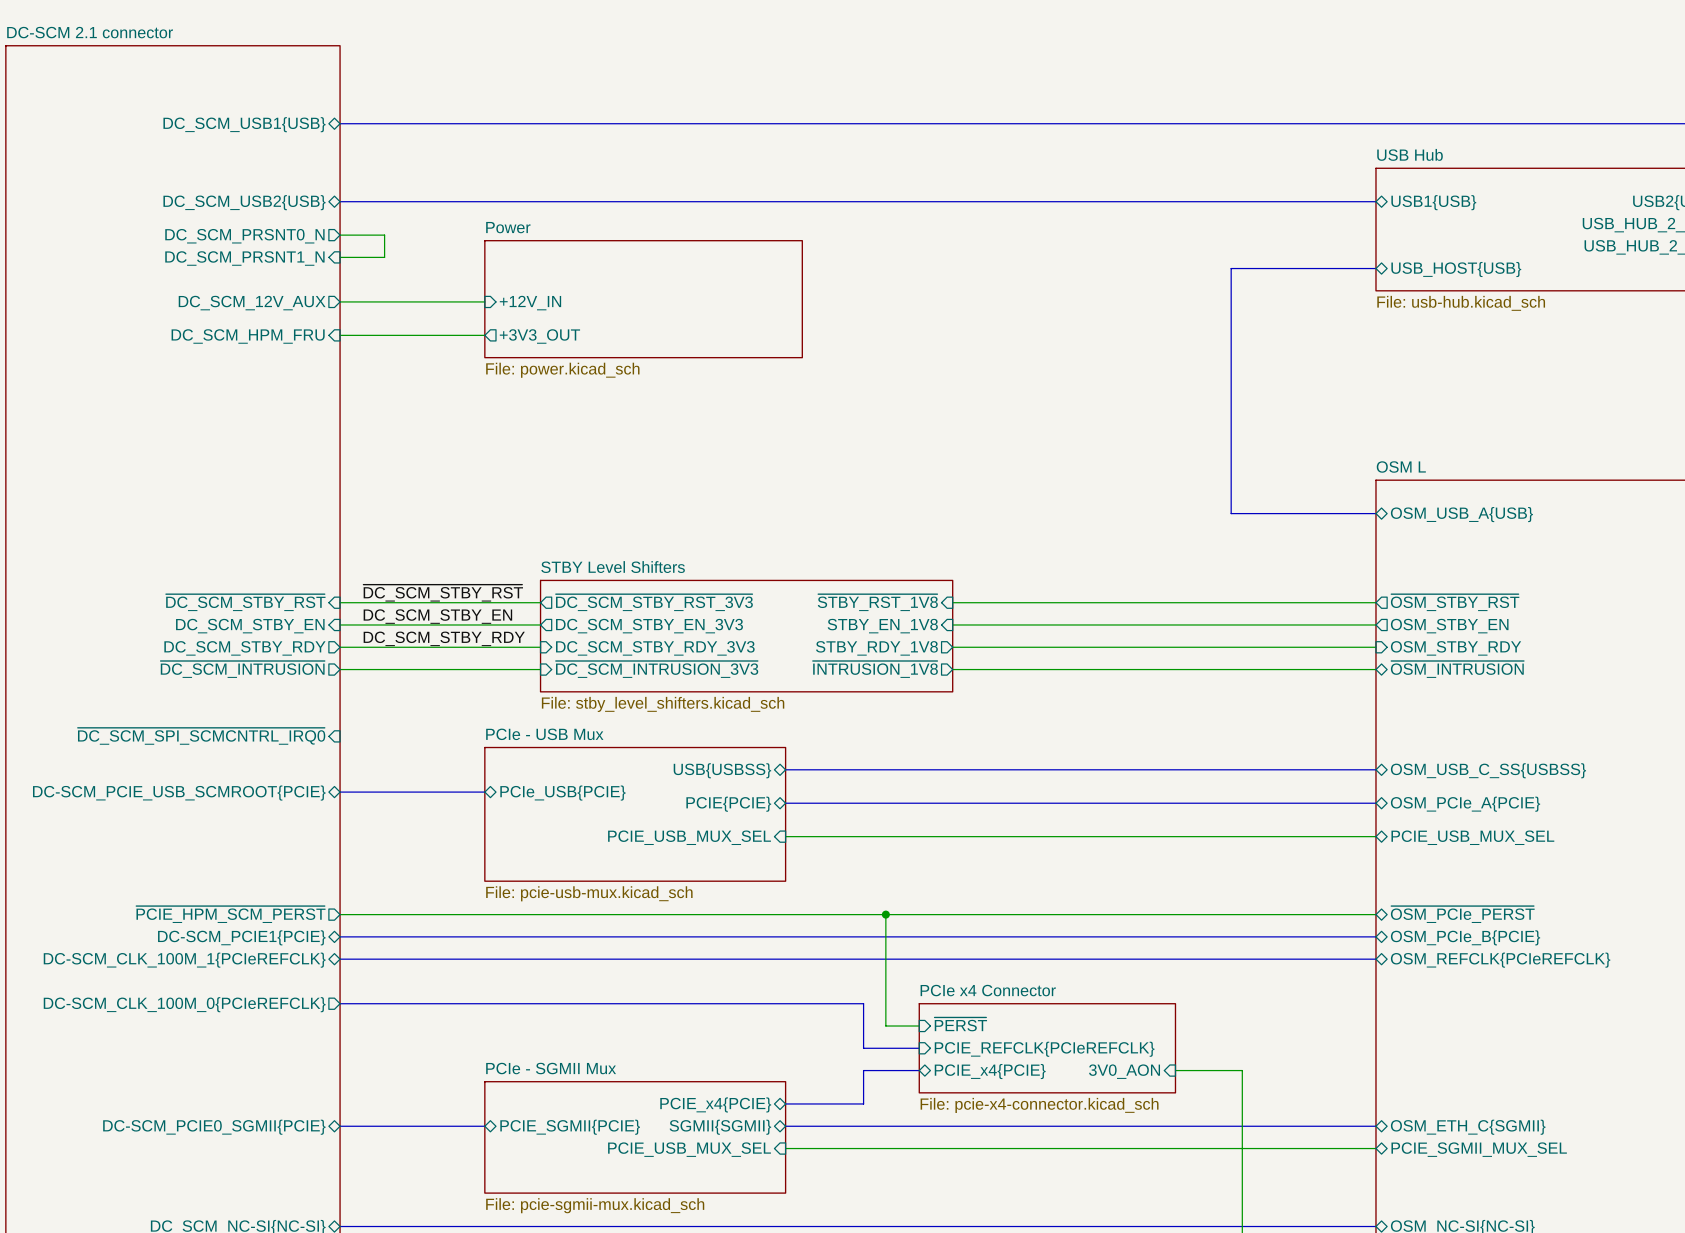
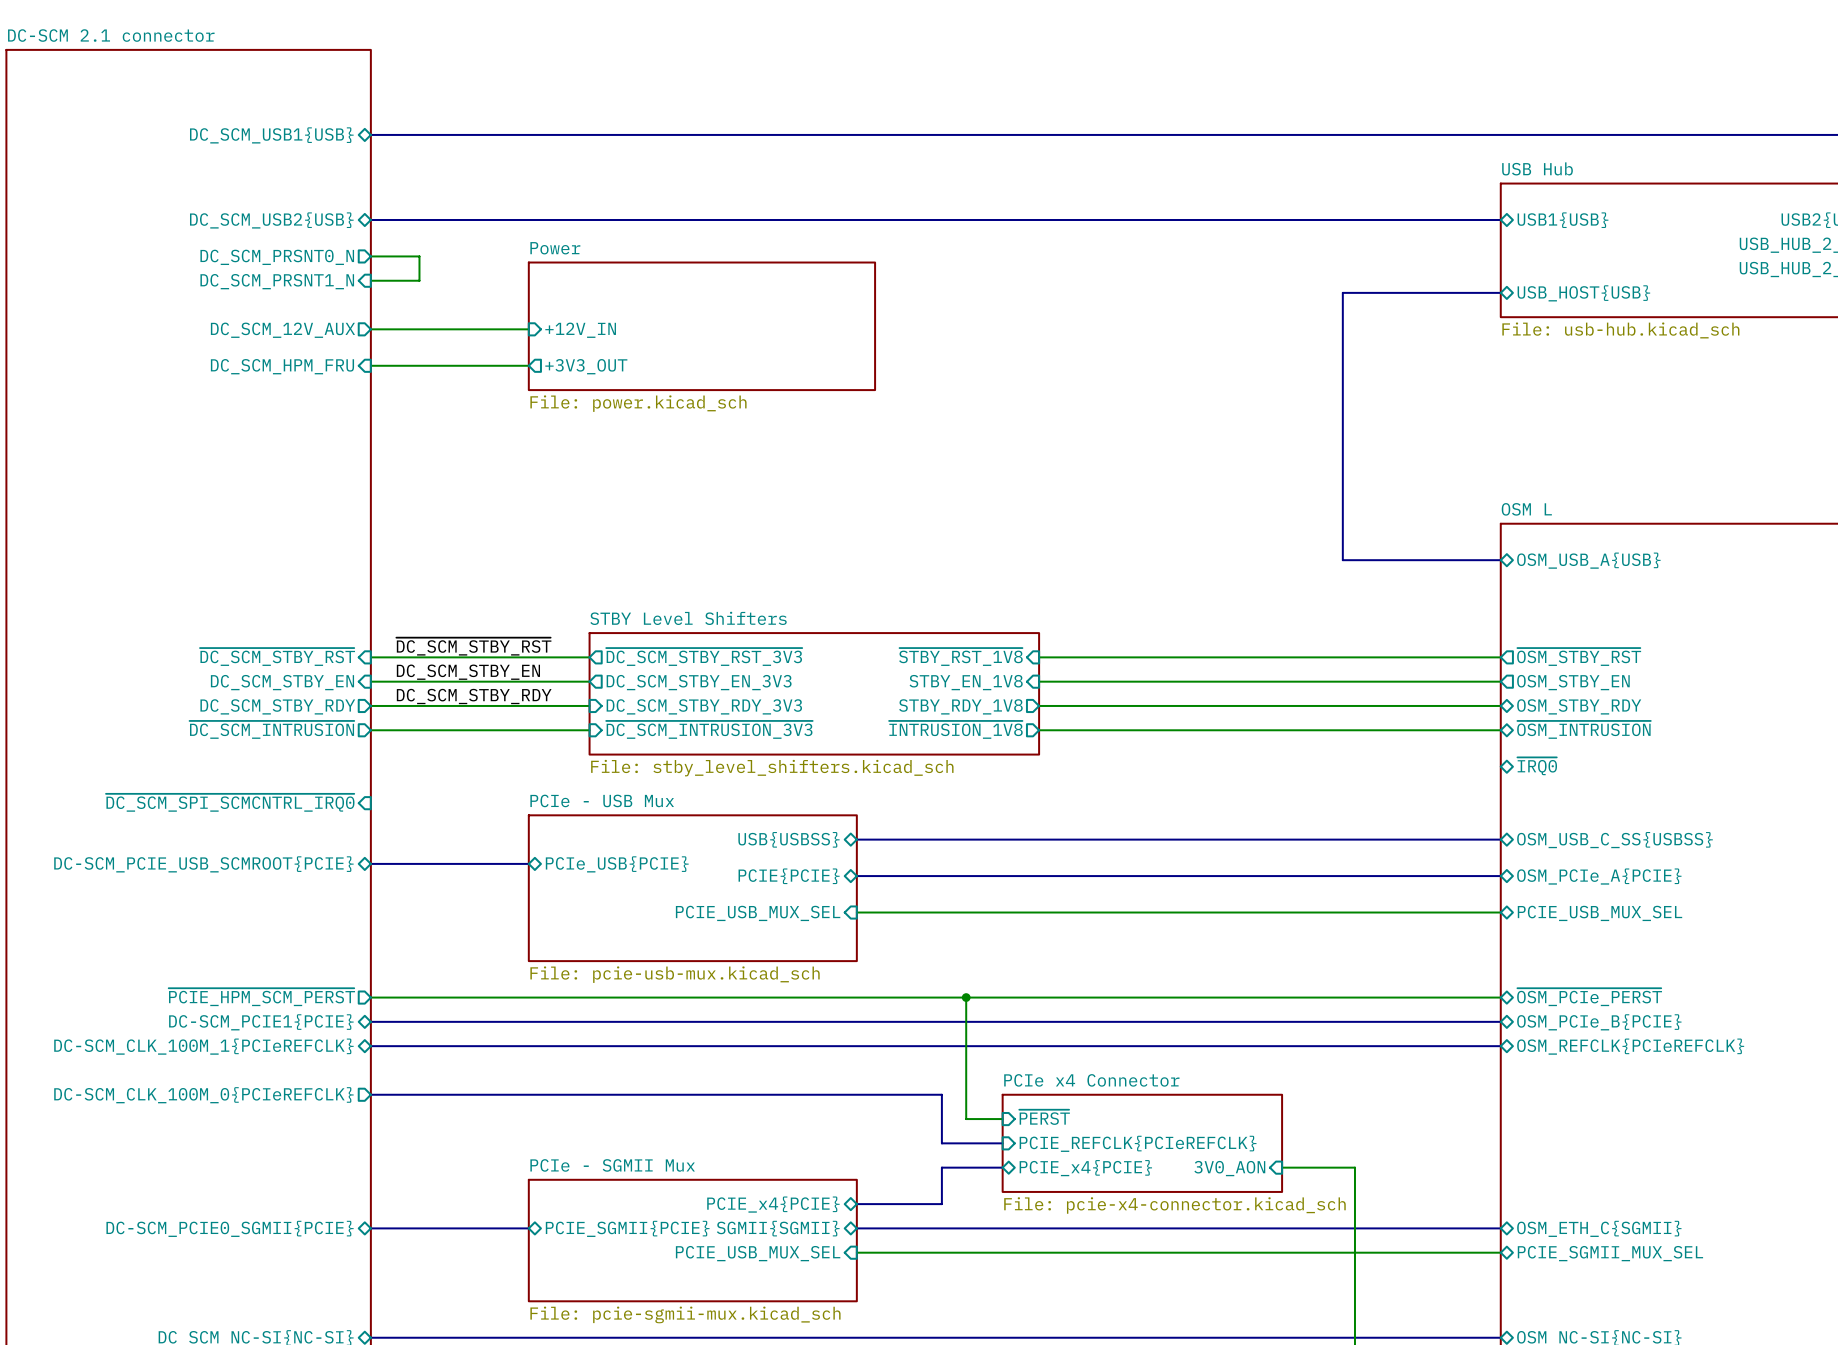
sheet pin shape: input (1456, 648) -> bidirectional (1579, 706)
sheet pin: none -> ~{IRQ0} (1537, 766)

